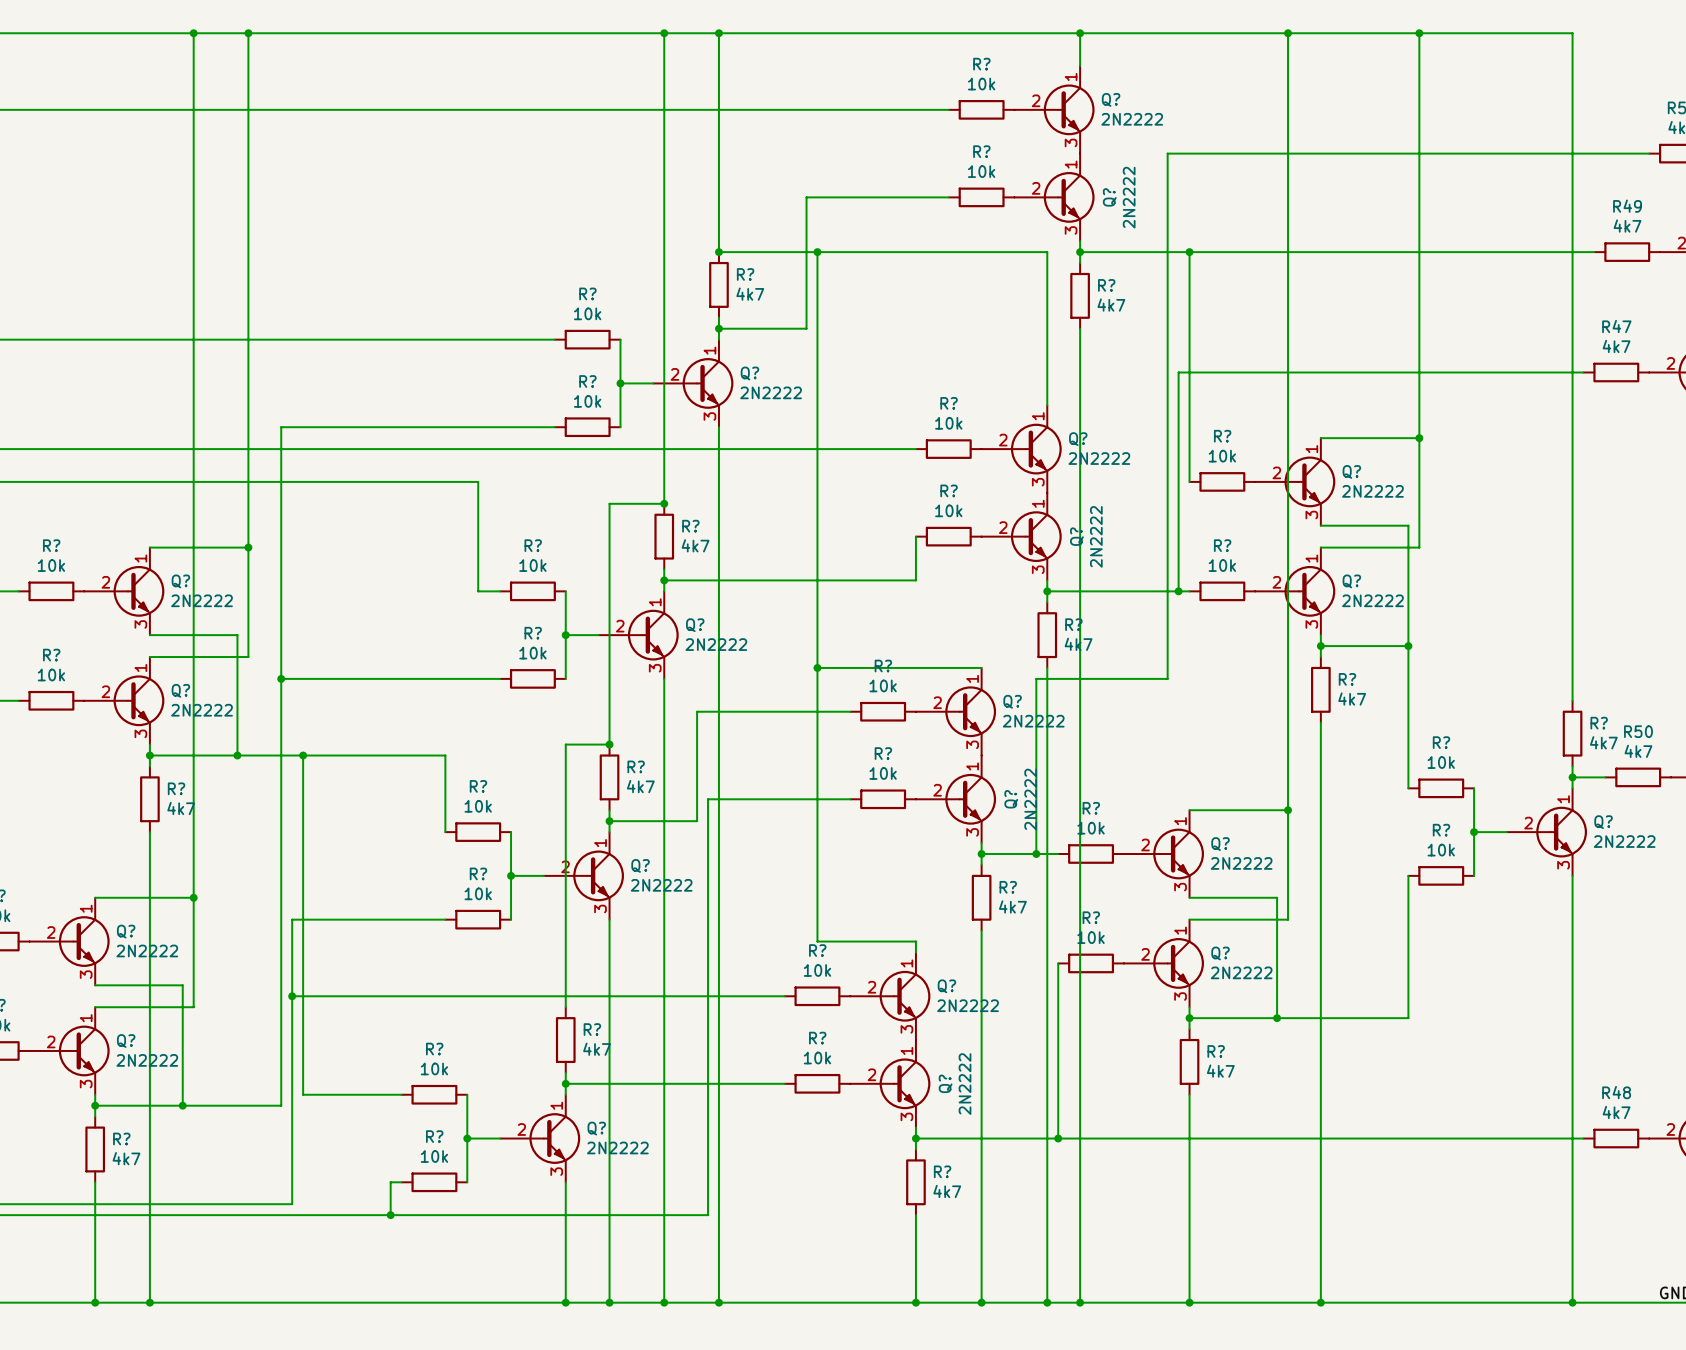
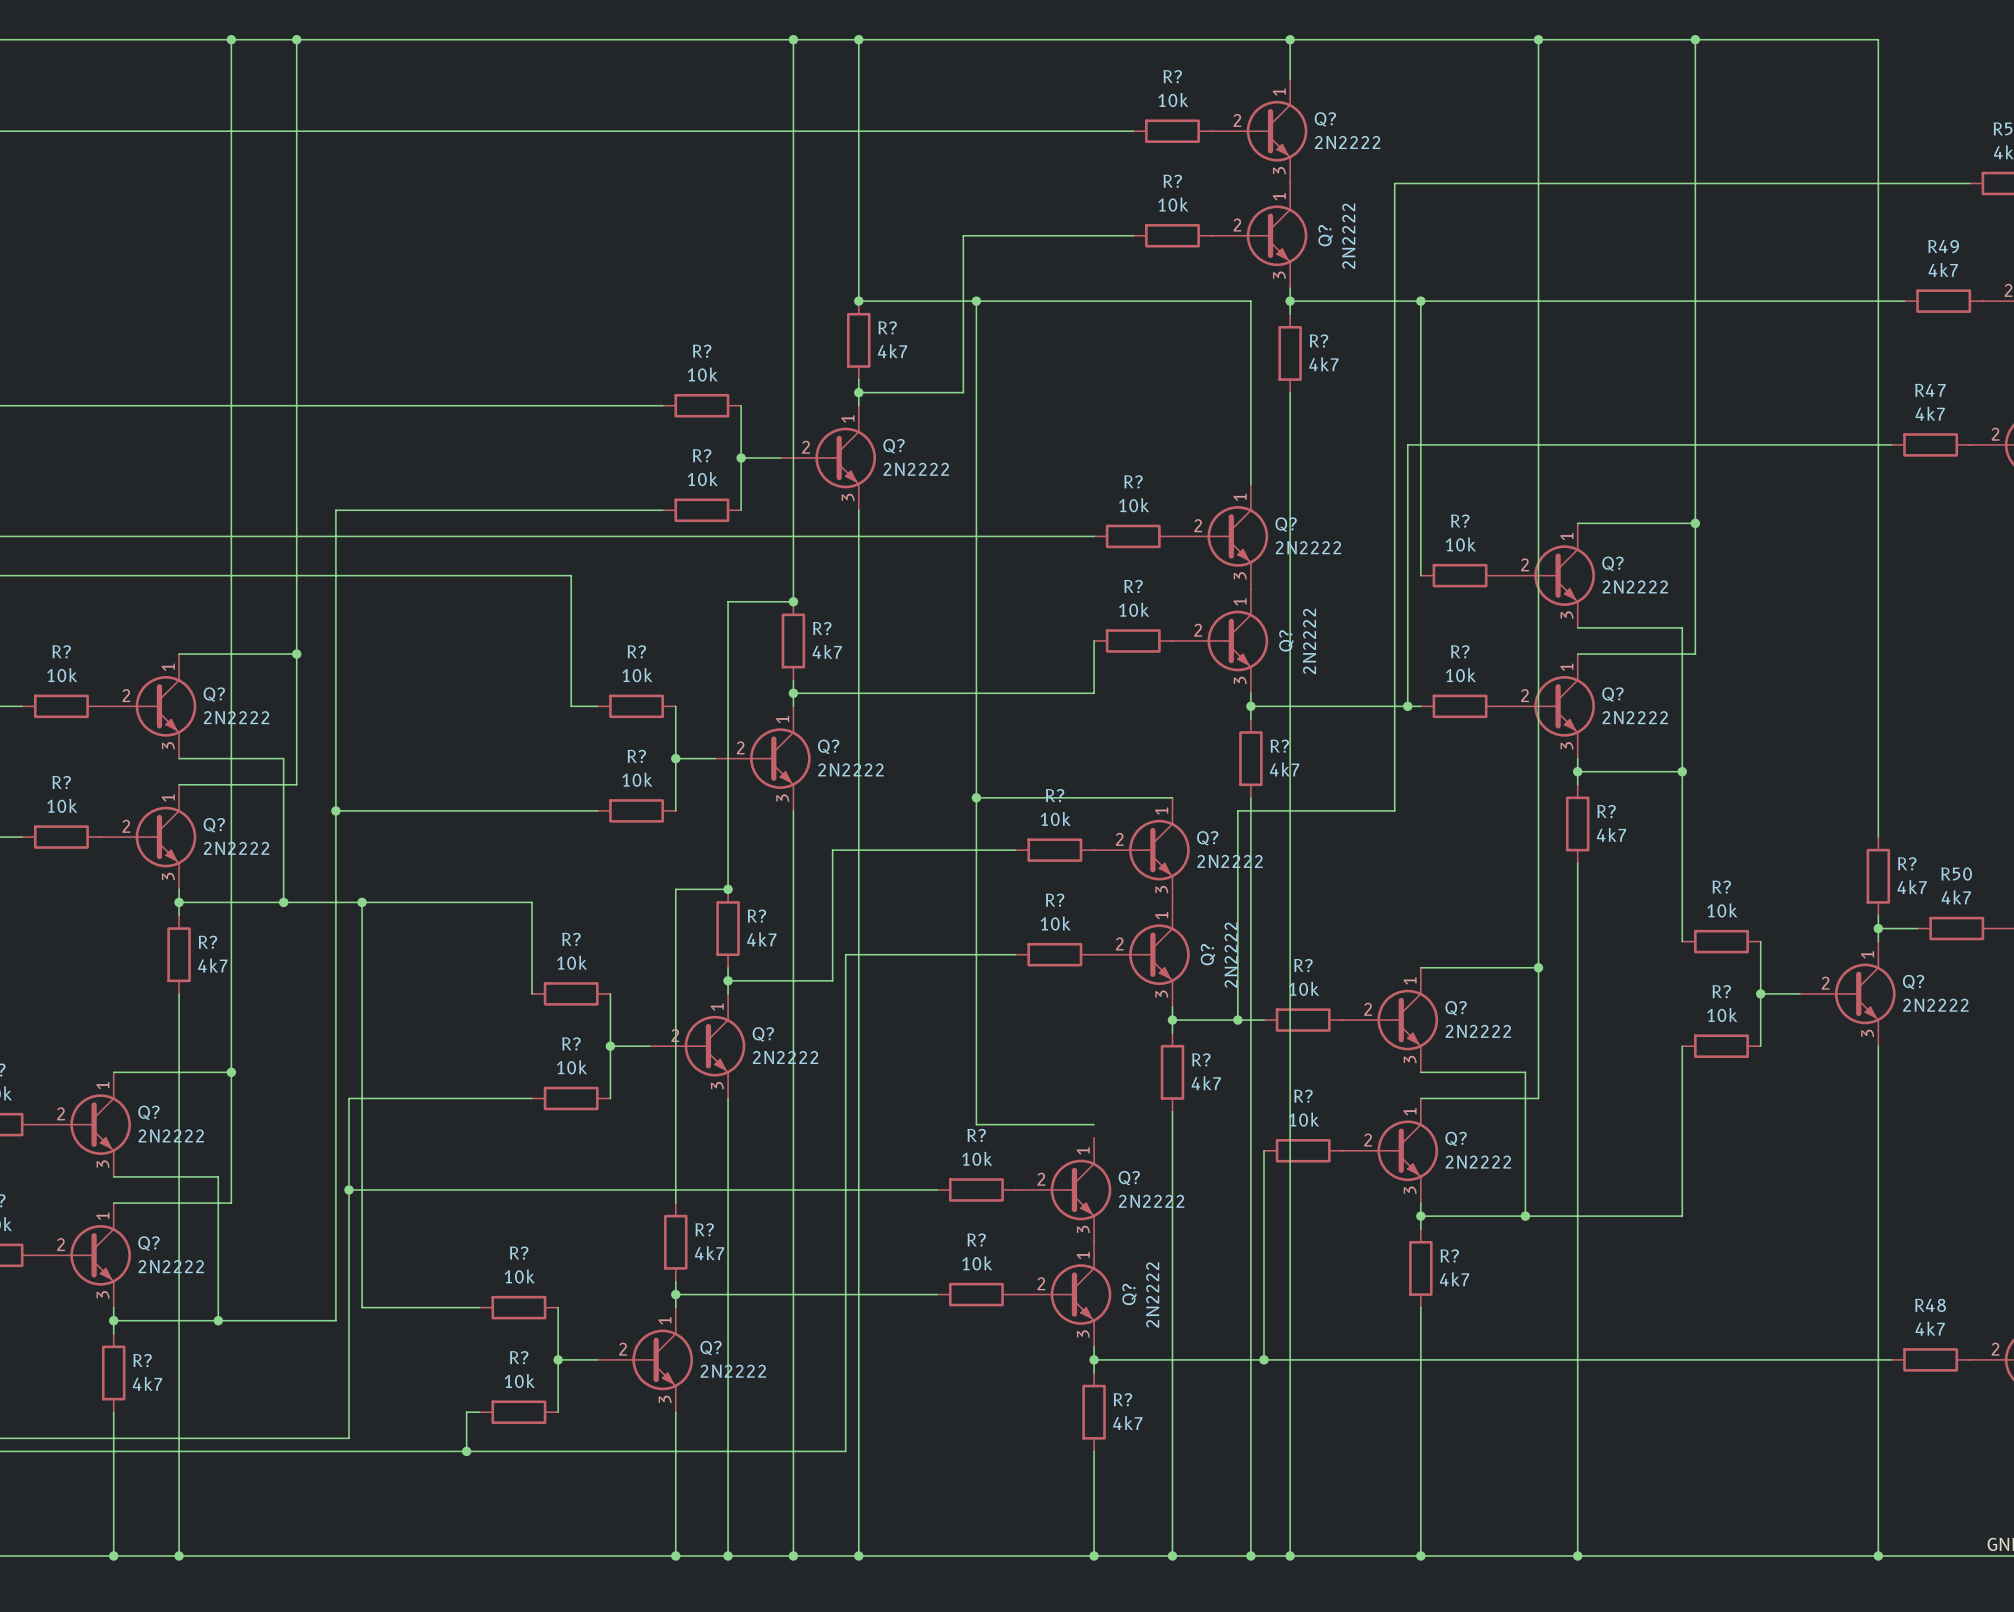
wire: (915, 941) (915, 952) -> none

